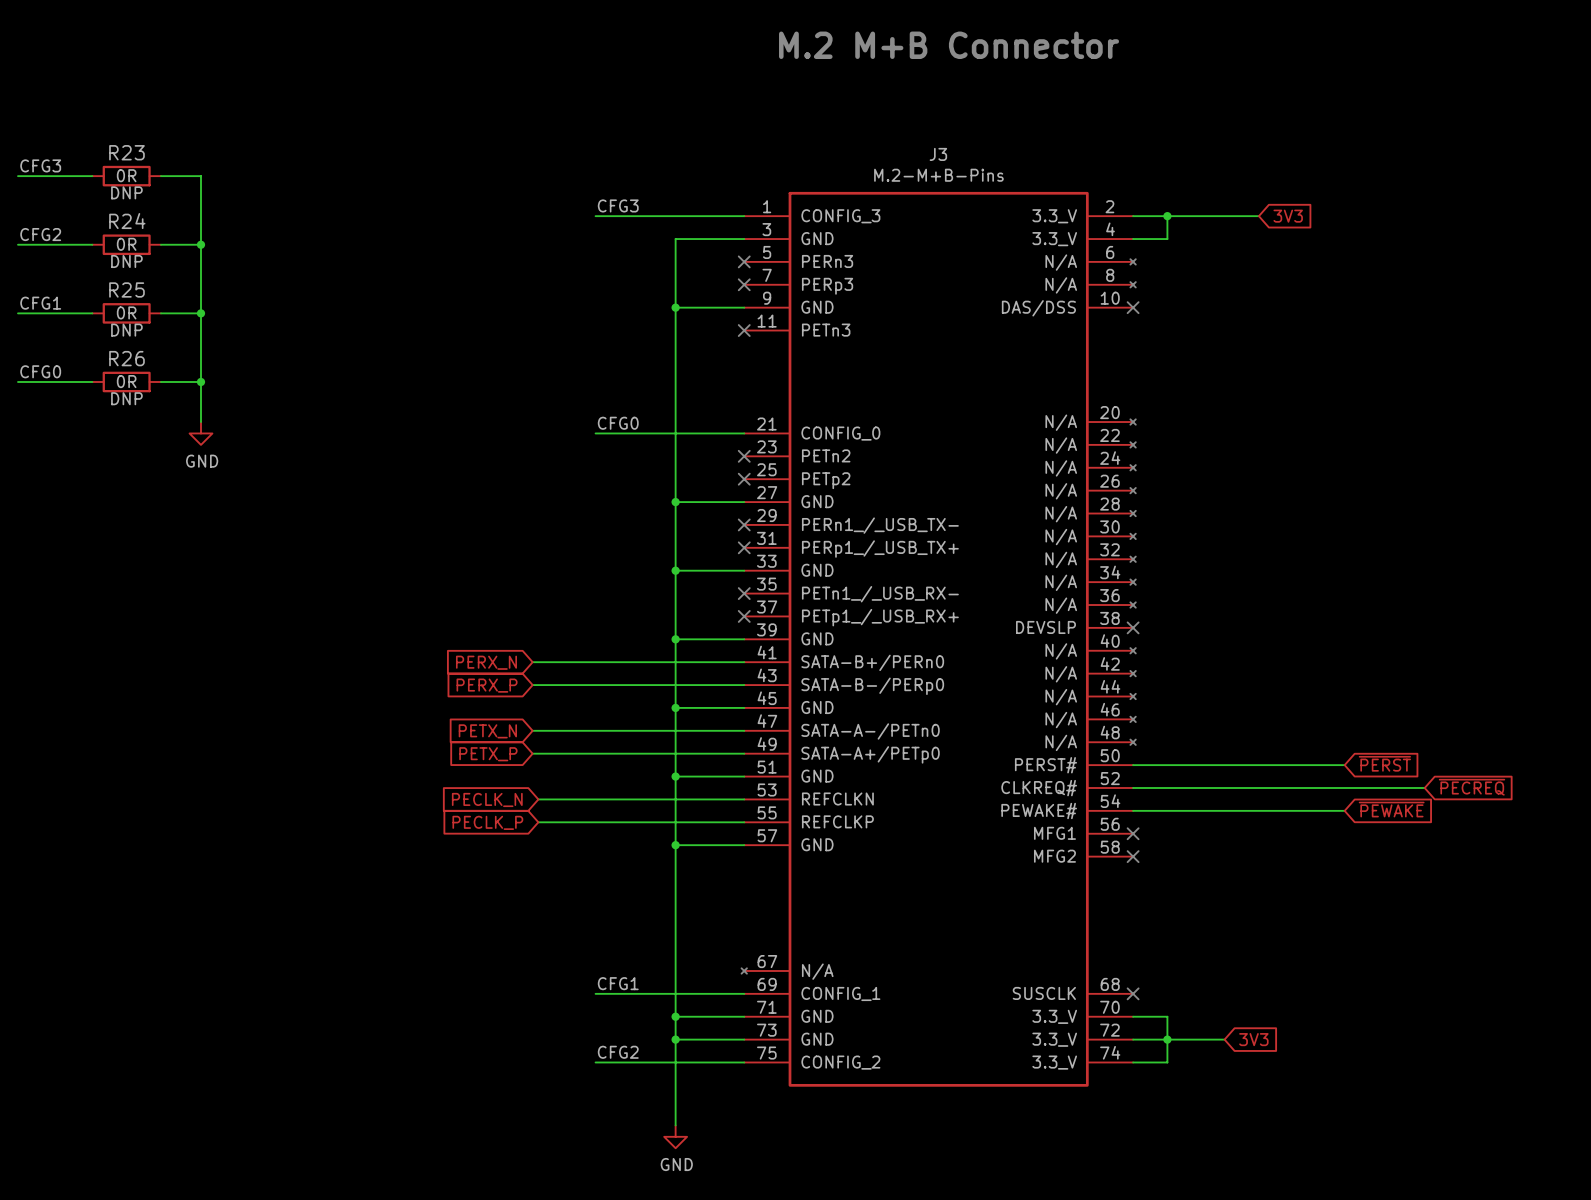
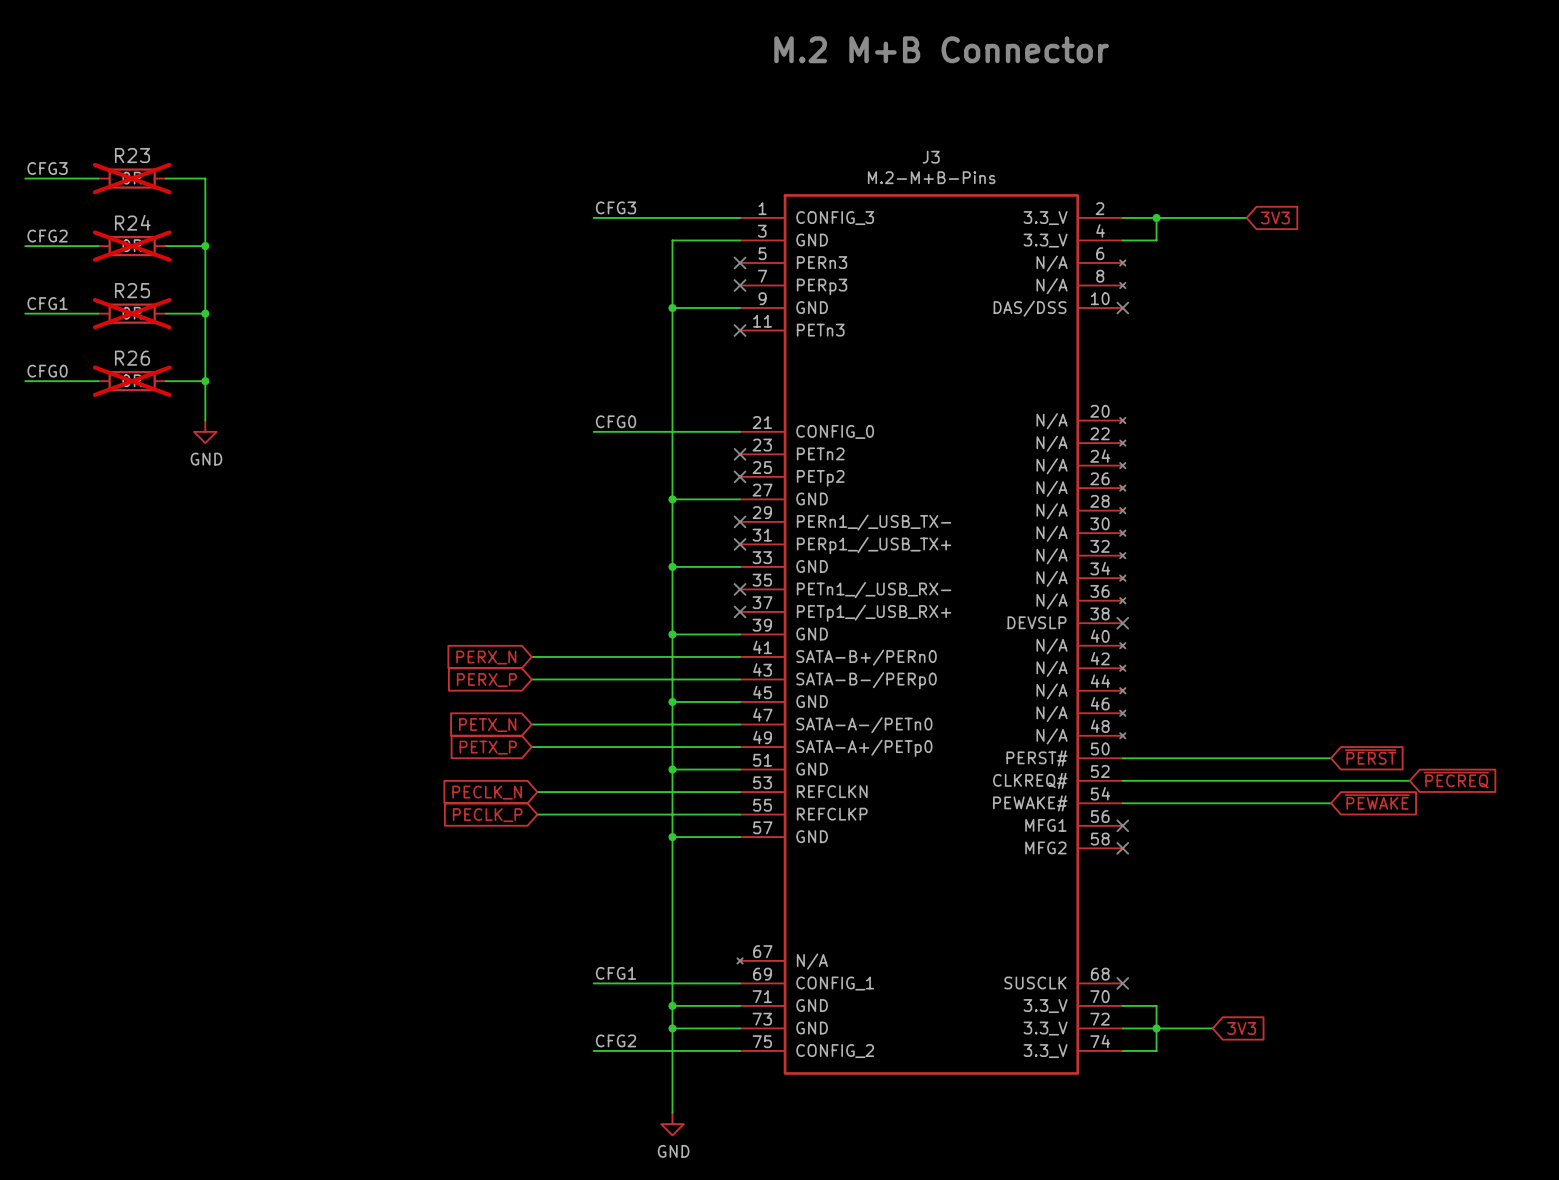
R23 do-not-place cross: none -> (132, 178)
R23 text: DNP (126, 192) -> none
R24 do-not-place cross: none -> (132, 246)
R24 text: DNP (126, 261) -> none
R25 do-not-place cross: none -> (132, 313)
R25 text: DNP (126, 330) -> none
R26 do-not-place cross: none -> (132, 381)
R26 text: DNP (126, 398) -> none

